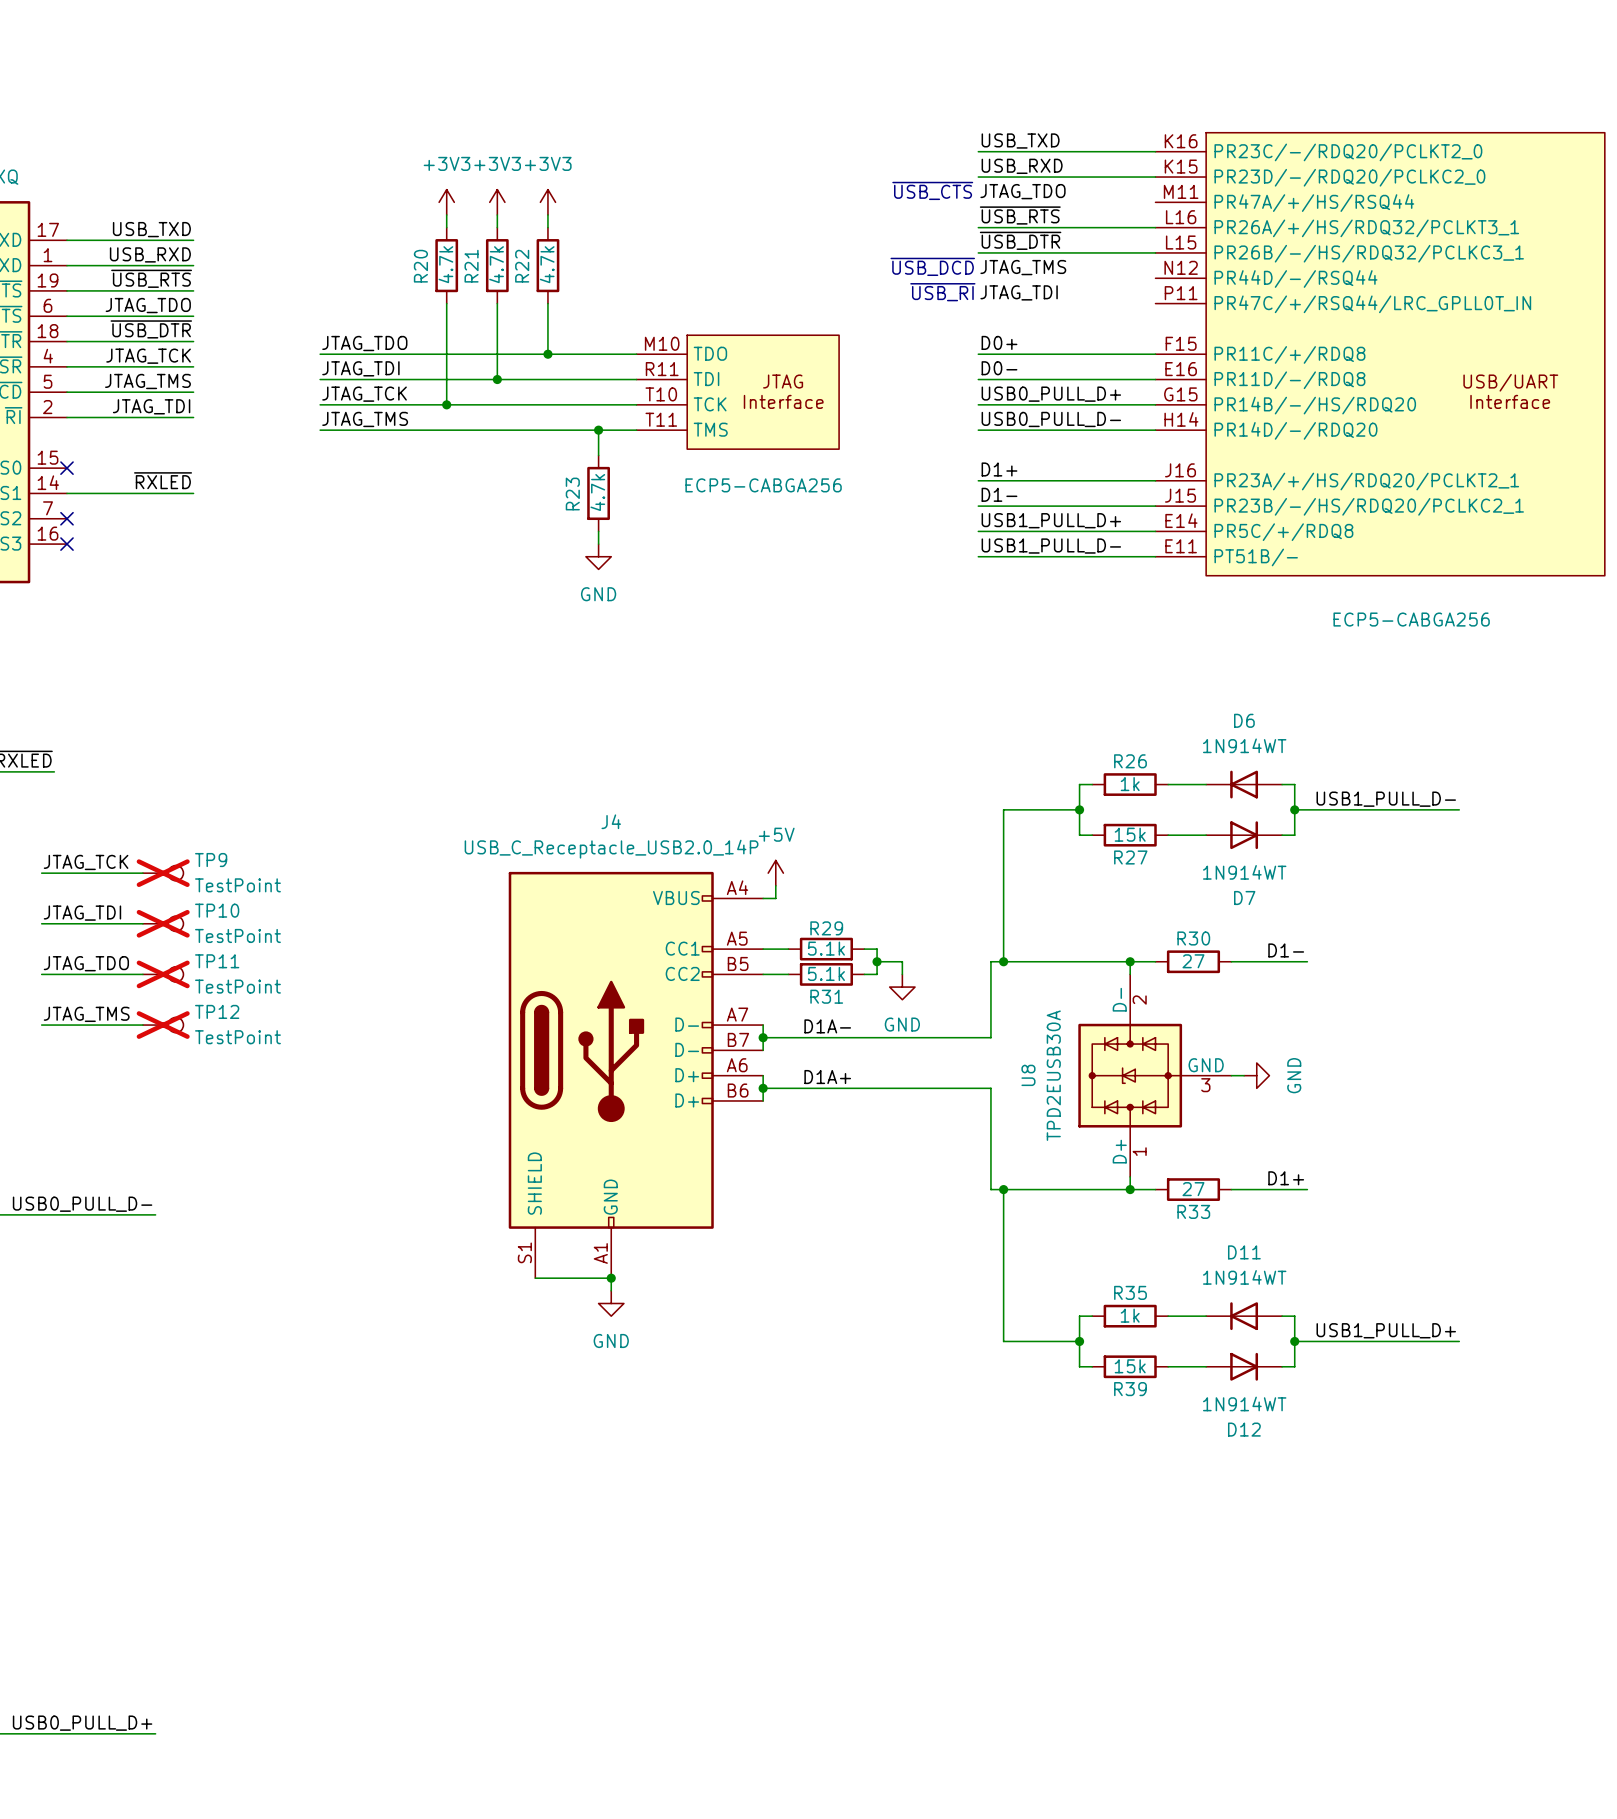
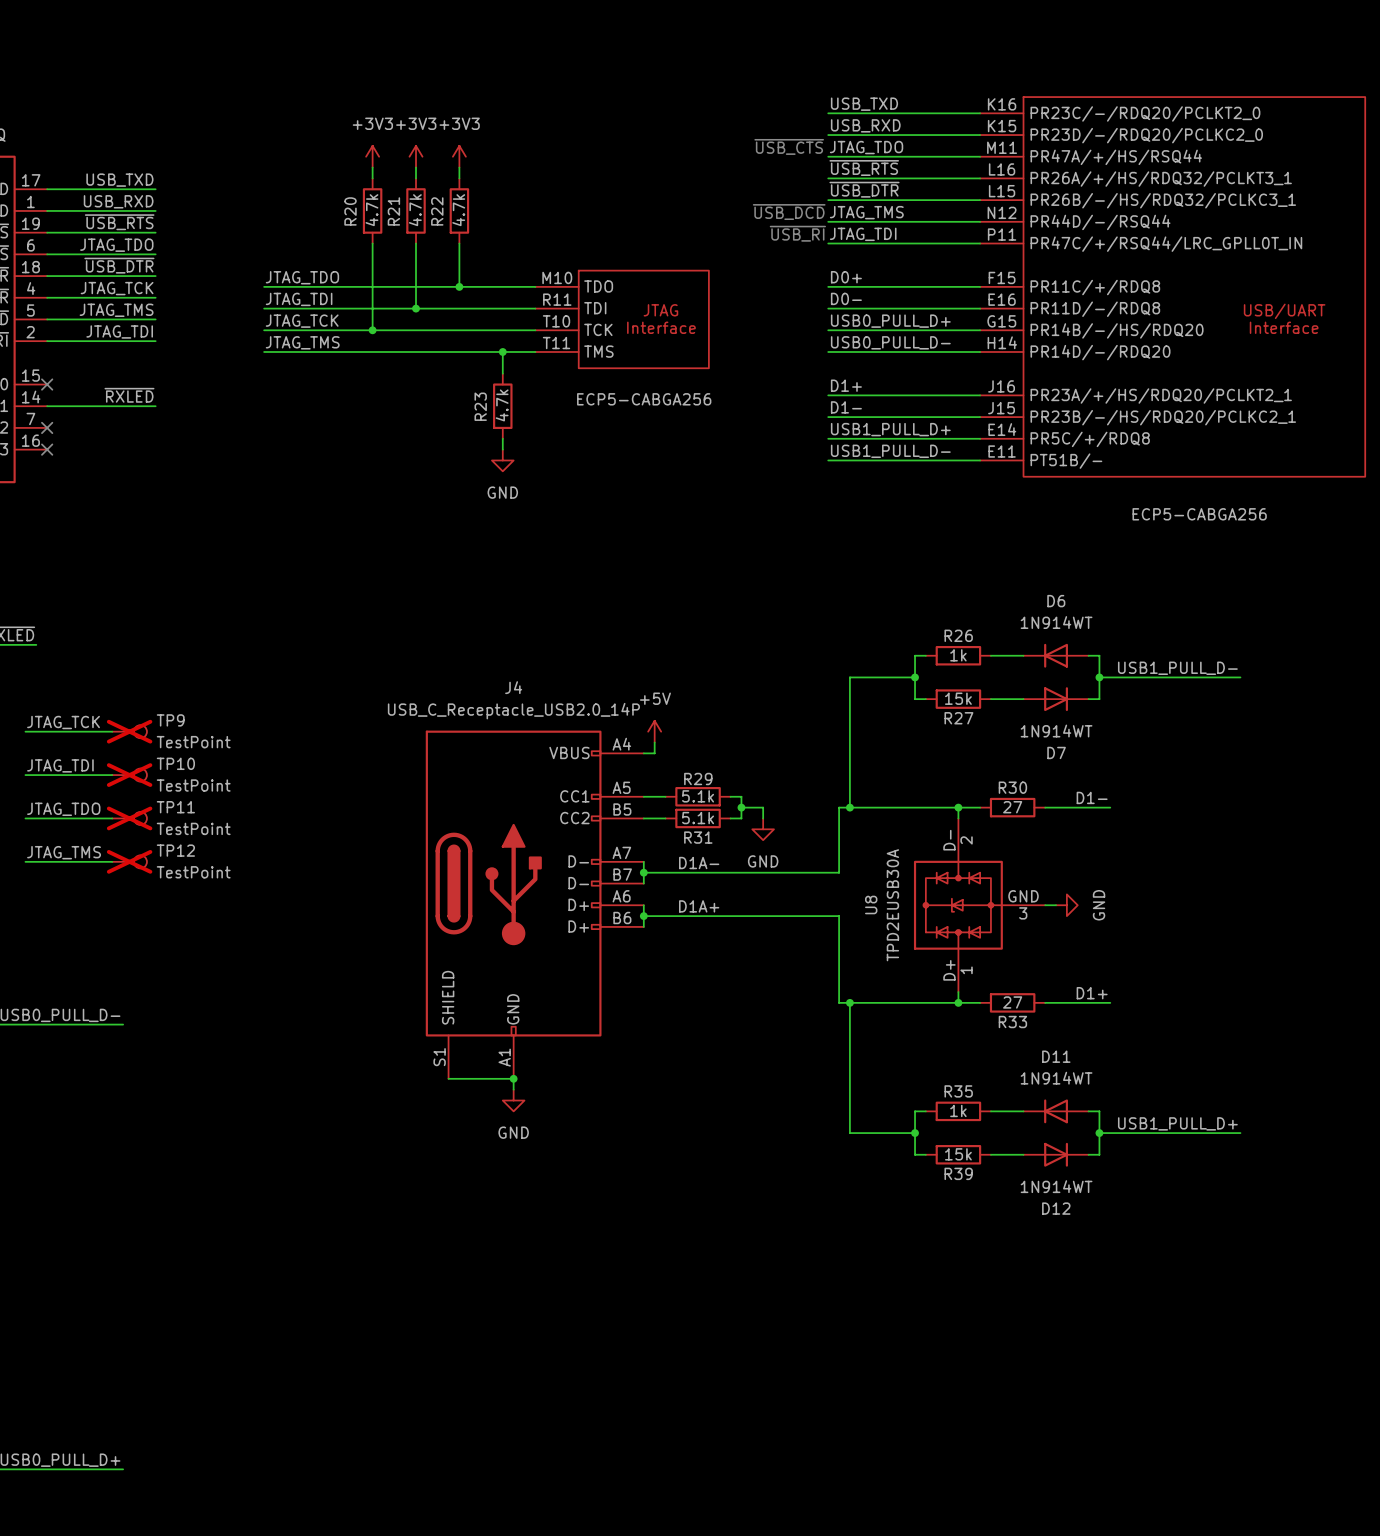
wire: none -> (828, 156) (980, 156)
wire: none -> (828, 221) (980, 221)
wire: none -> (828, 243) (980, 243)

